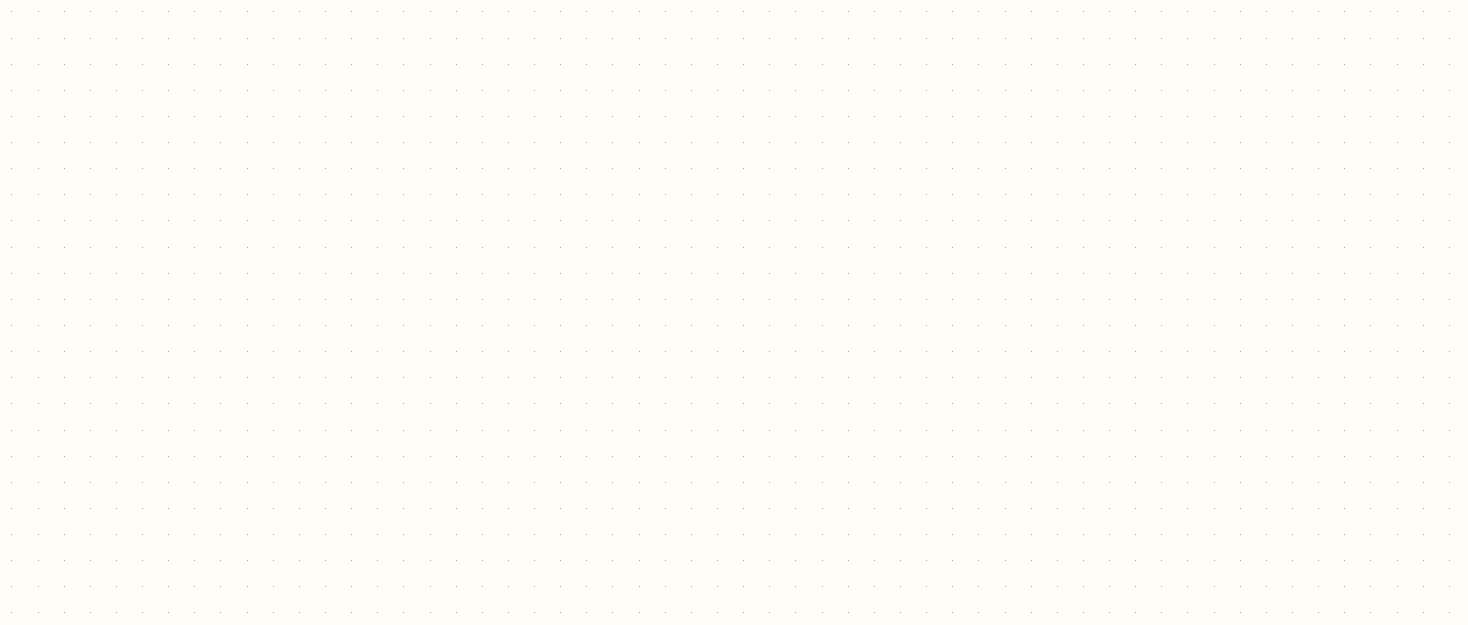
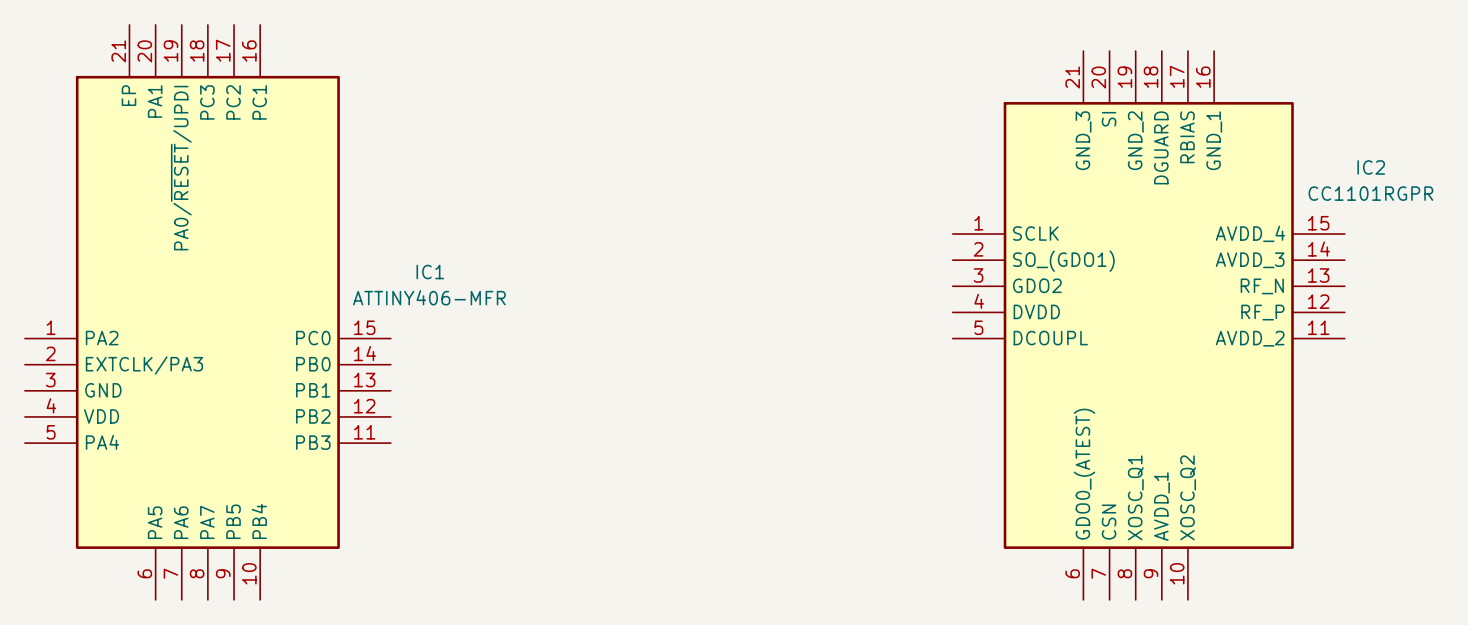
IC1: none -> ATTINY406-MFR (207, 312)
IC2: none -> CC1101RGPR (1148, 325)

